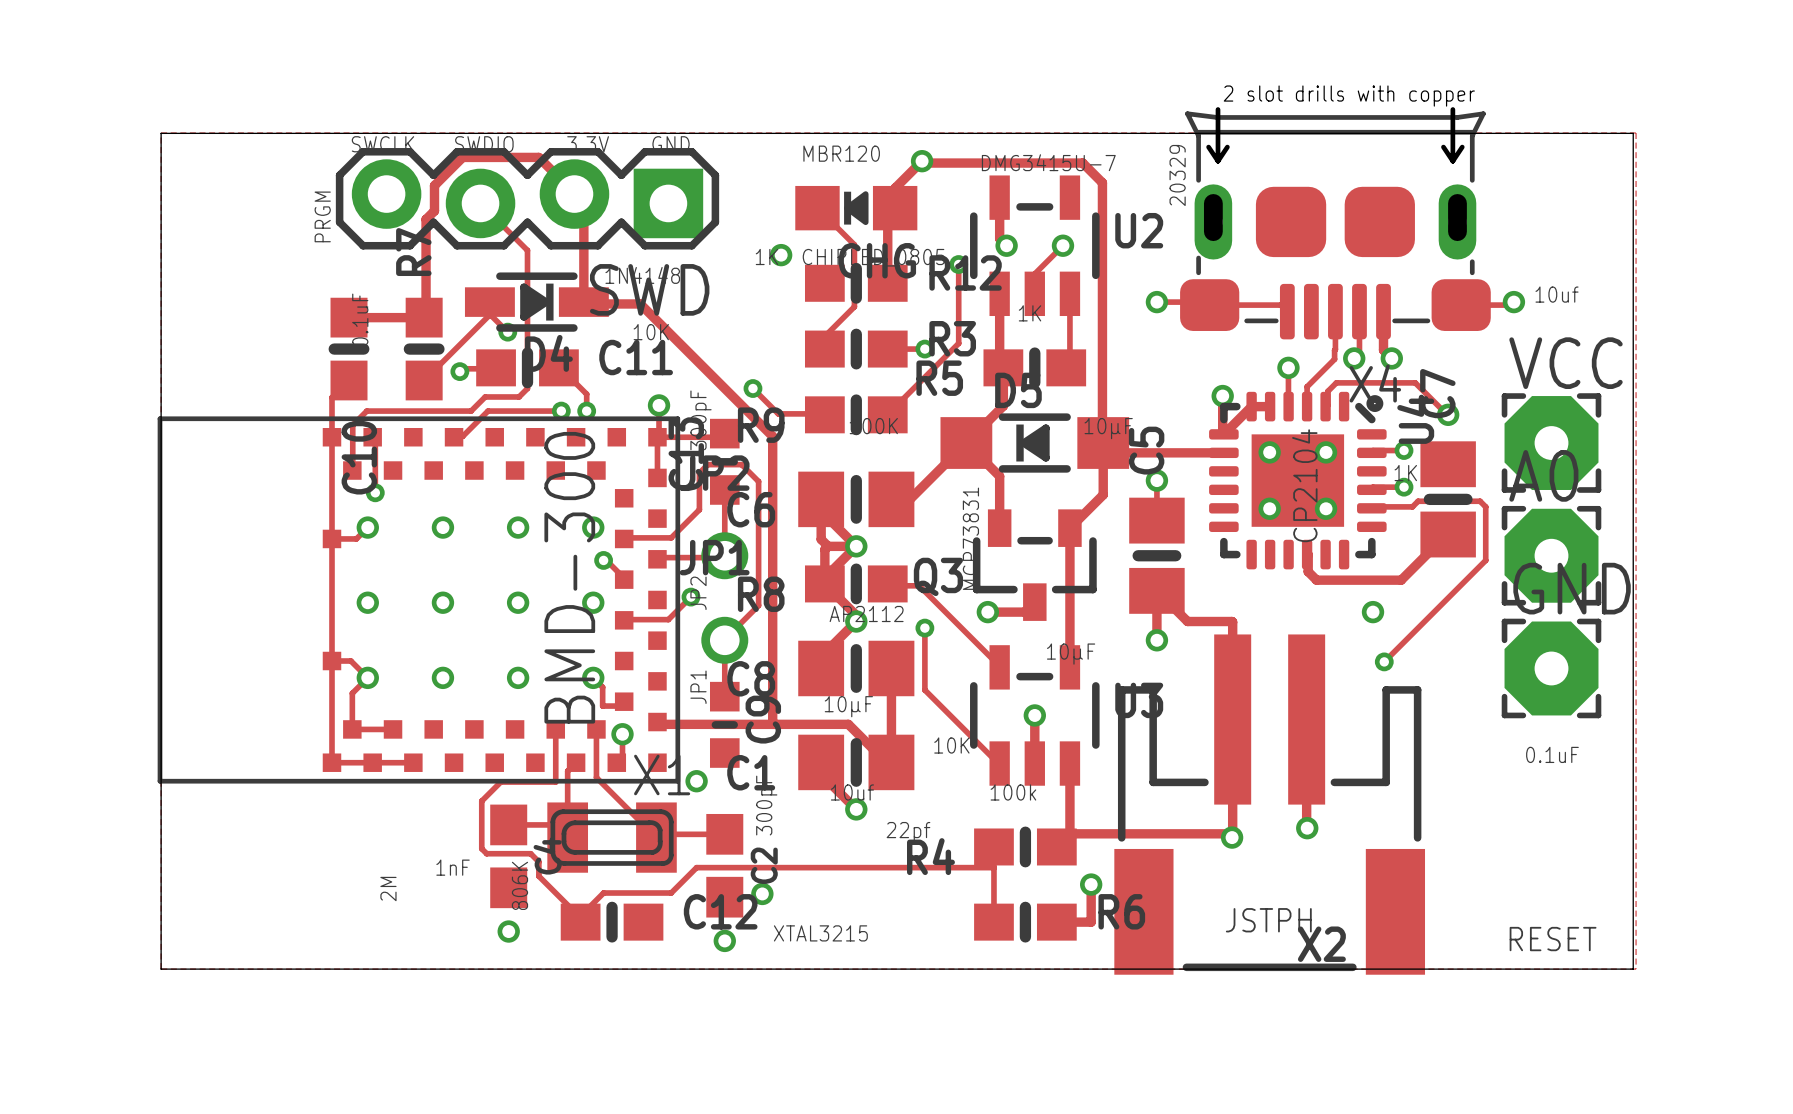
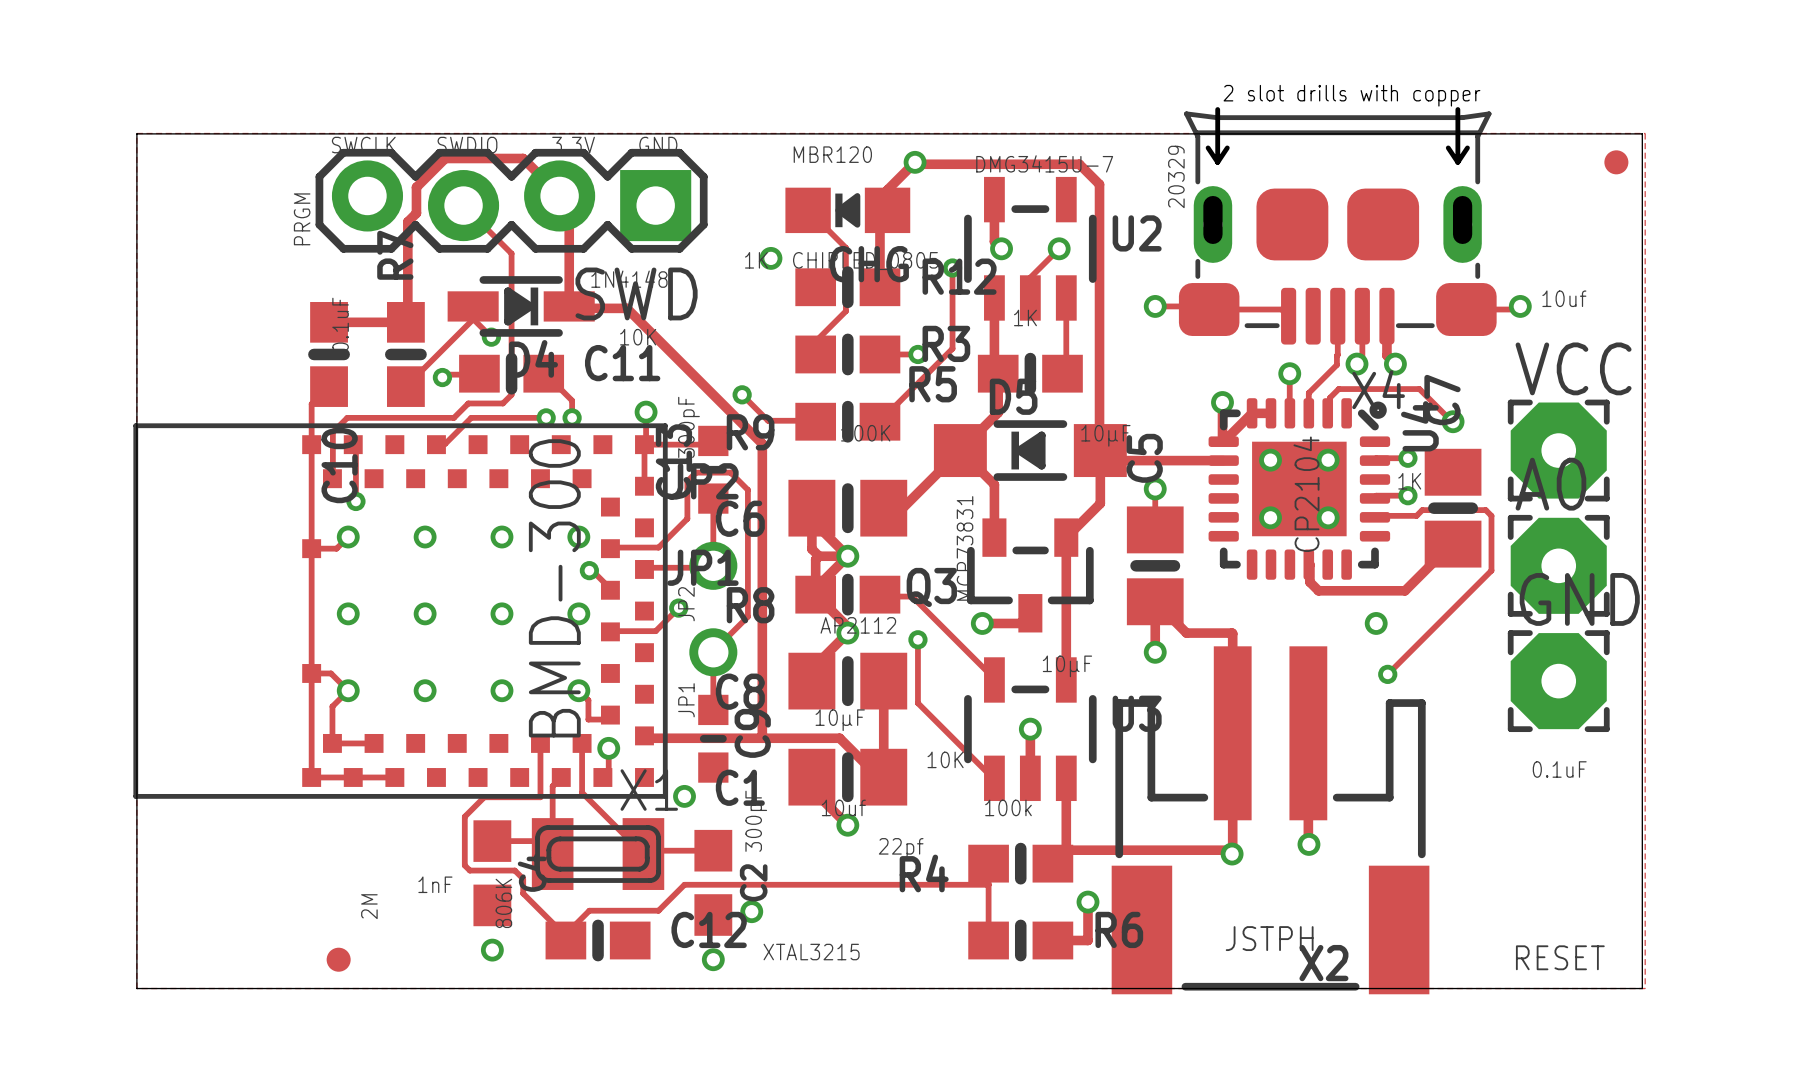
part: none -> (1616, 162)
part: none -> (338, 959)

